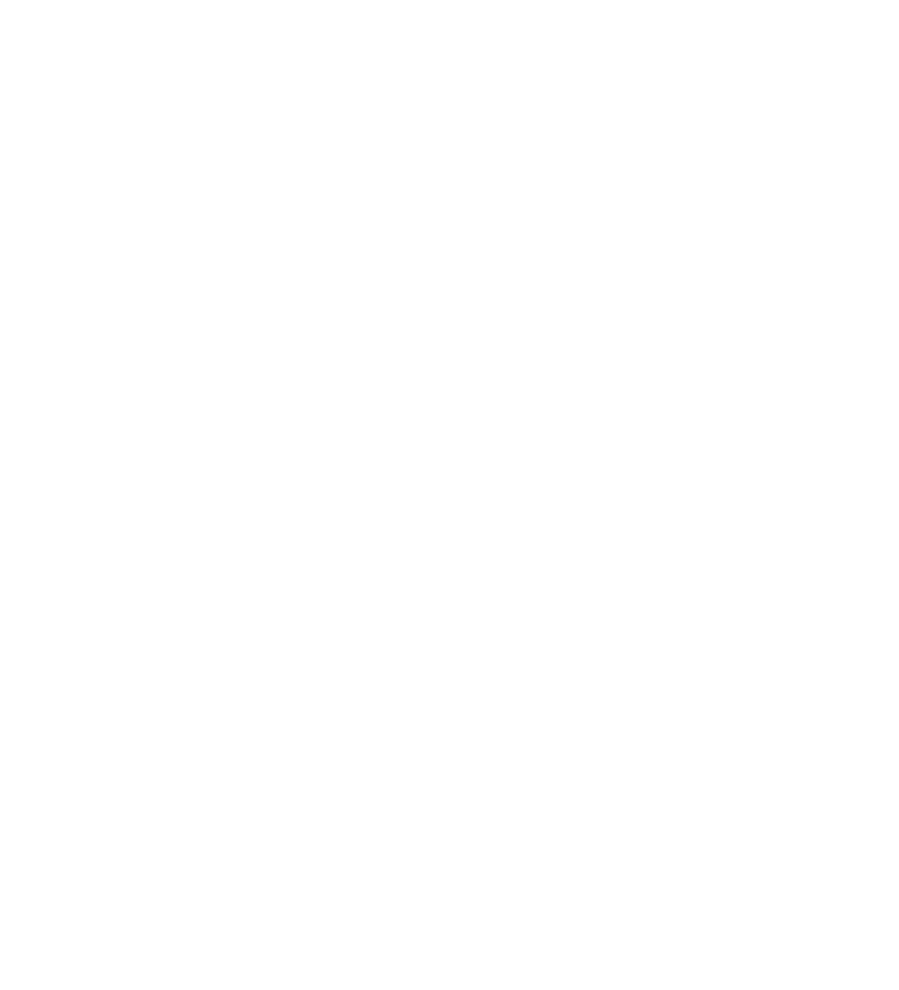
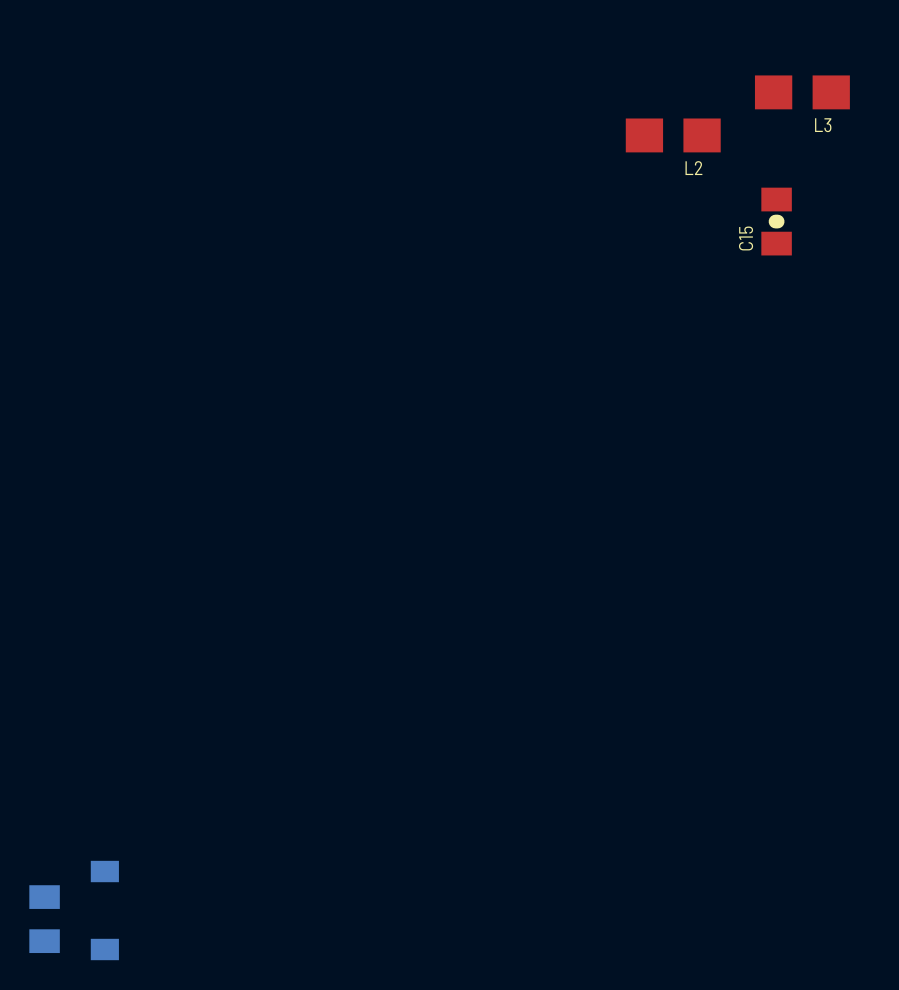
L3: none -> (802, 92)
L2: none -> (673, 135)
C15: none -> (776, 221)
part: none -> (104, 910)
part: none -> (44, 919)

